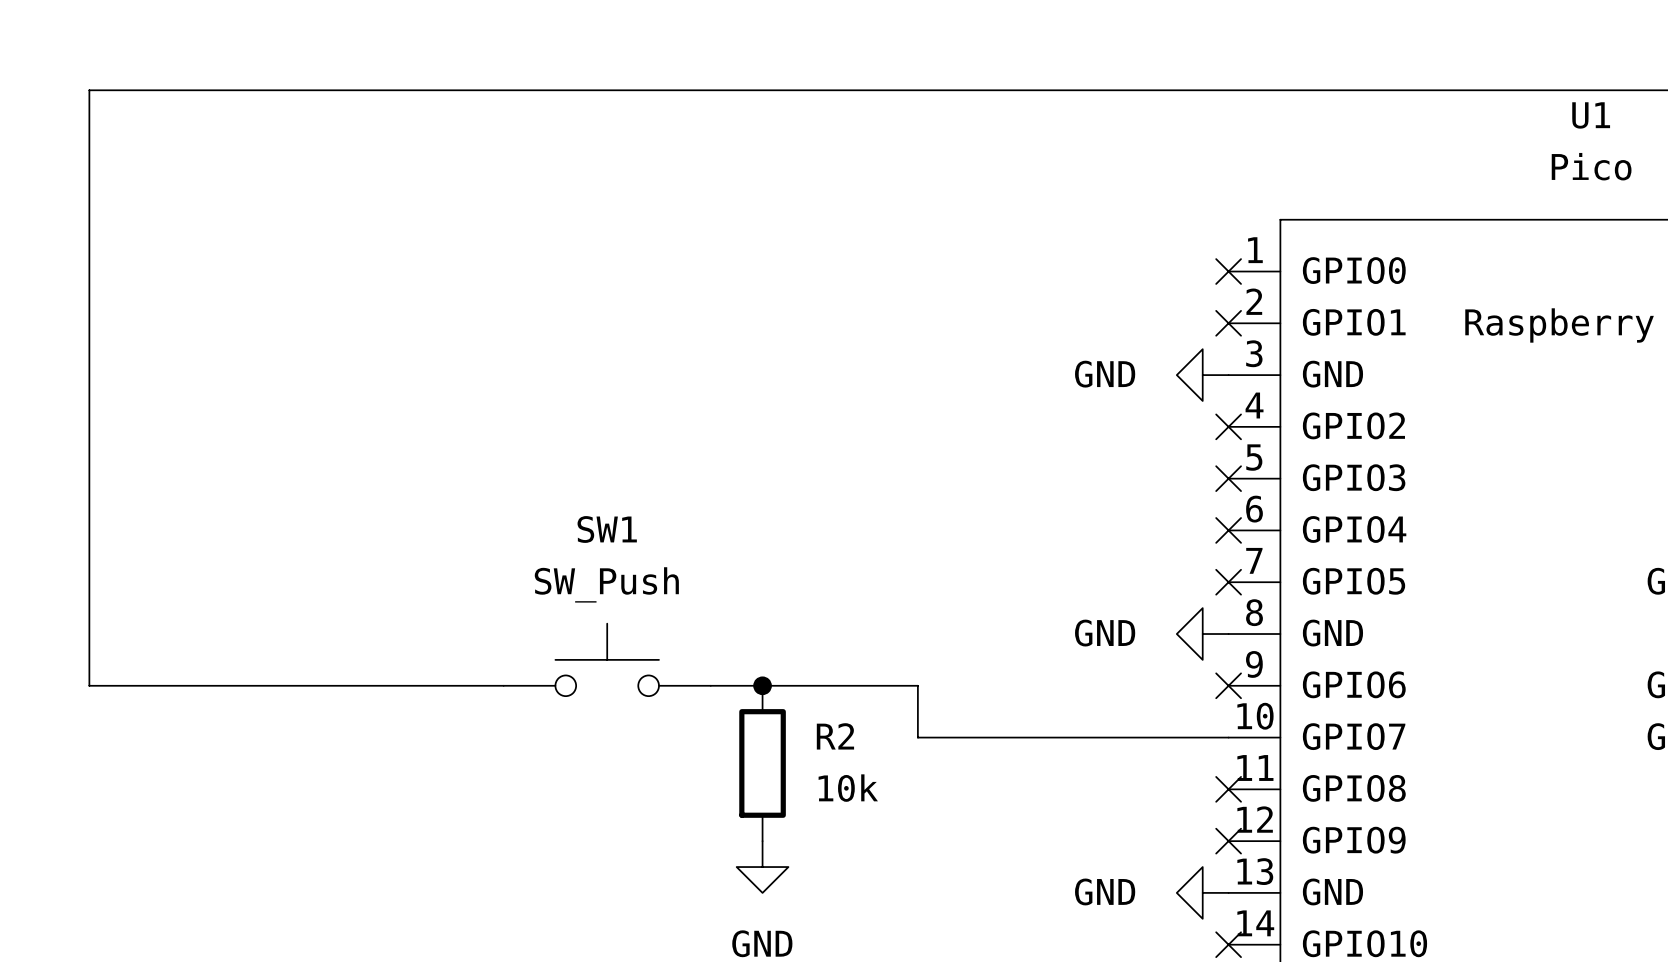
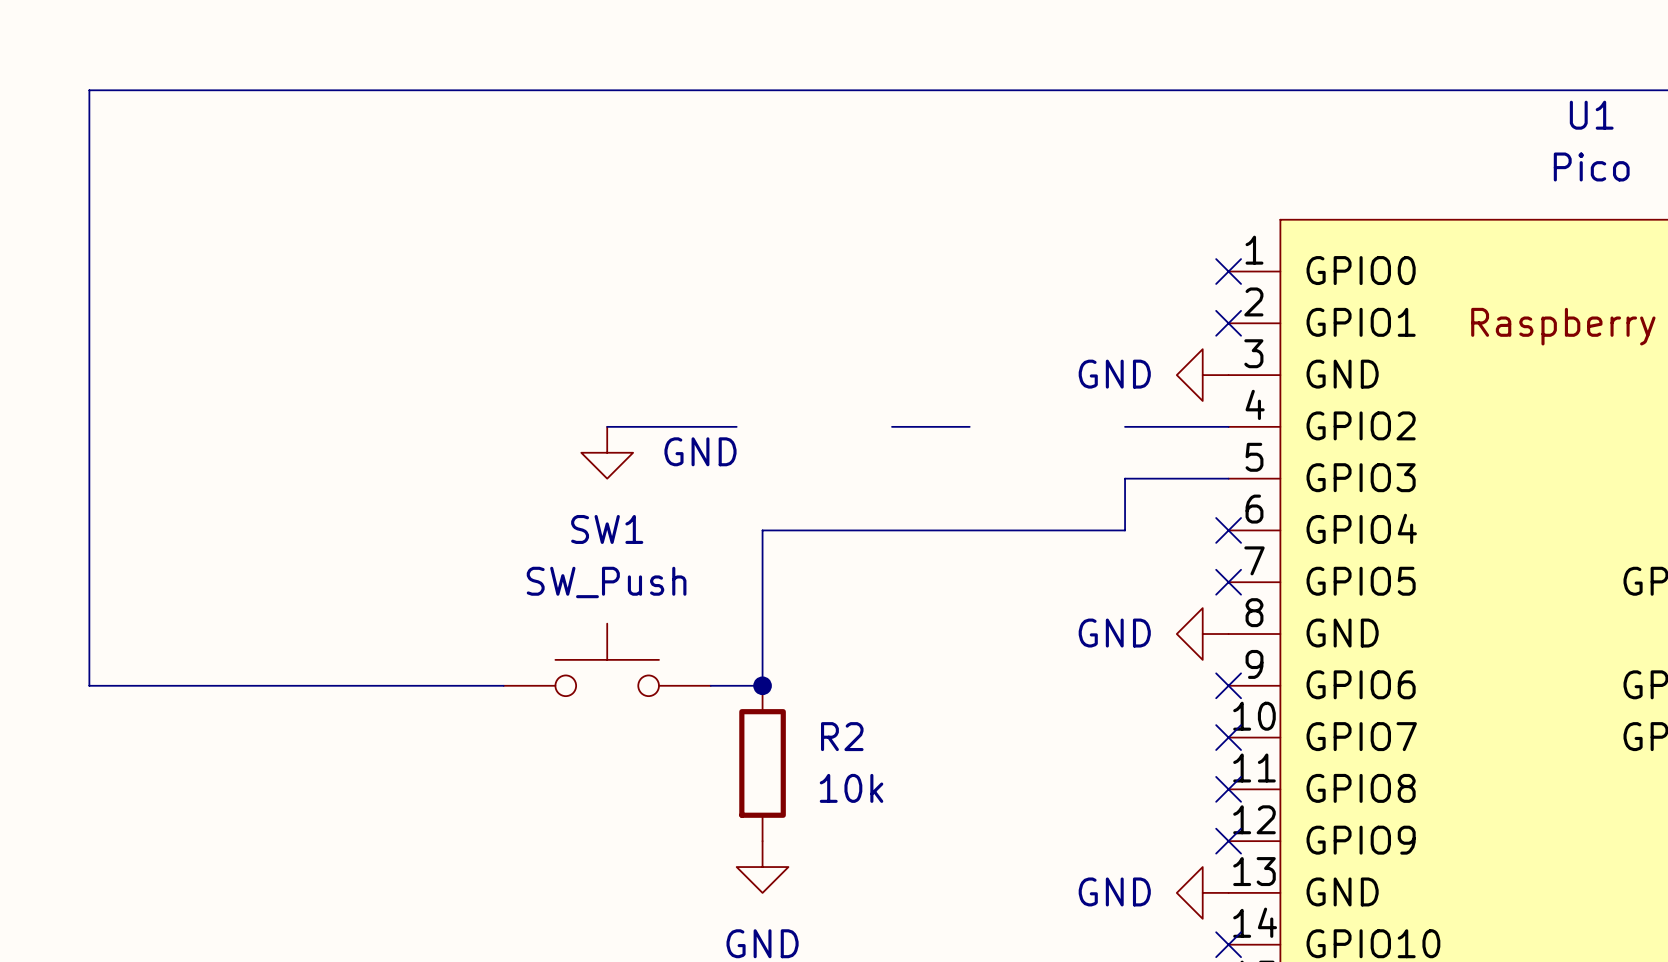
wire: none -> (607, 426) (736, 426)
wire: none -> (892, 426) (969, 426)
wire: none -> (1125, 426) (1228, 426)
no-connect mark: (1228, 426) -> none
power symbol: none -> GND (607, 452)
no-connect mark: (1228, 478) -> none
wire: (762, 685) (917, 685) (917, 737) (1228, 737) -> (762, 685) (762, 530) (1125, 530) (1125, 478) (1228, 478)
no-connect mark: none -> (1228, 737)

